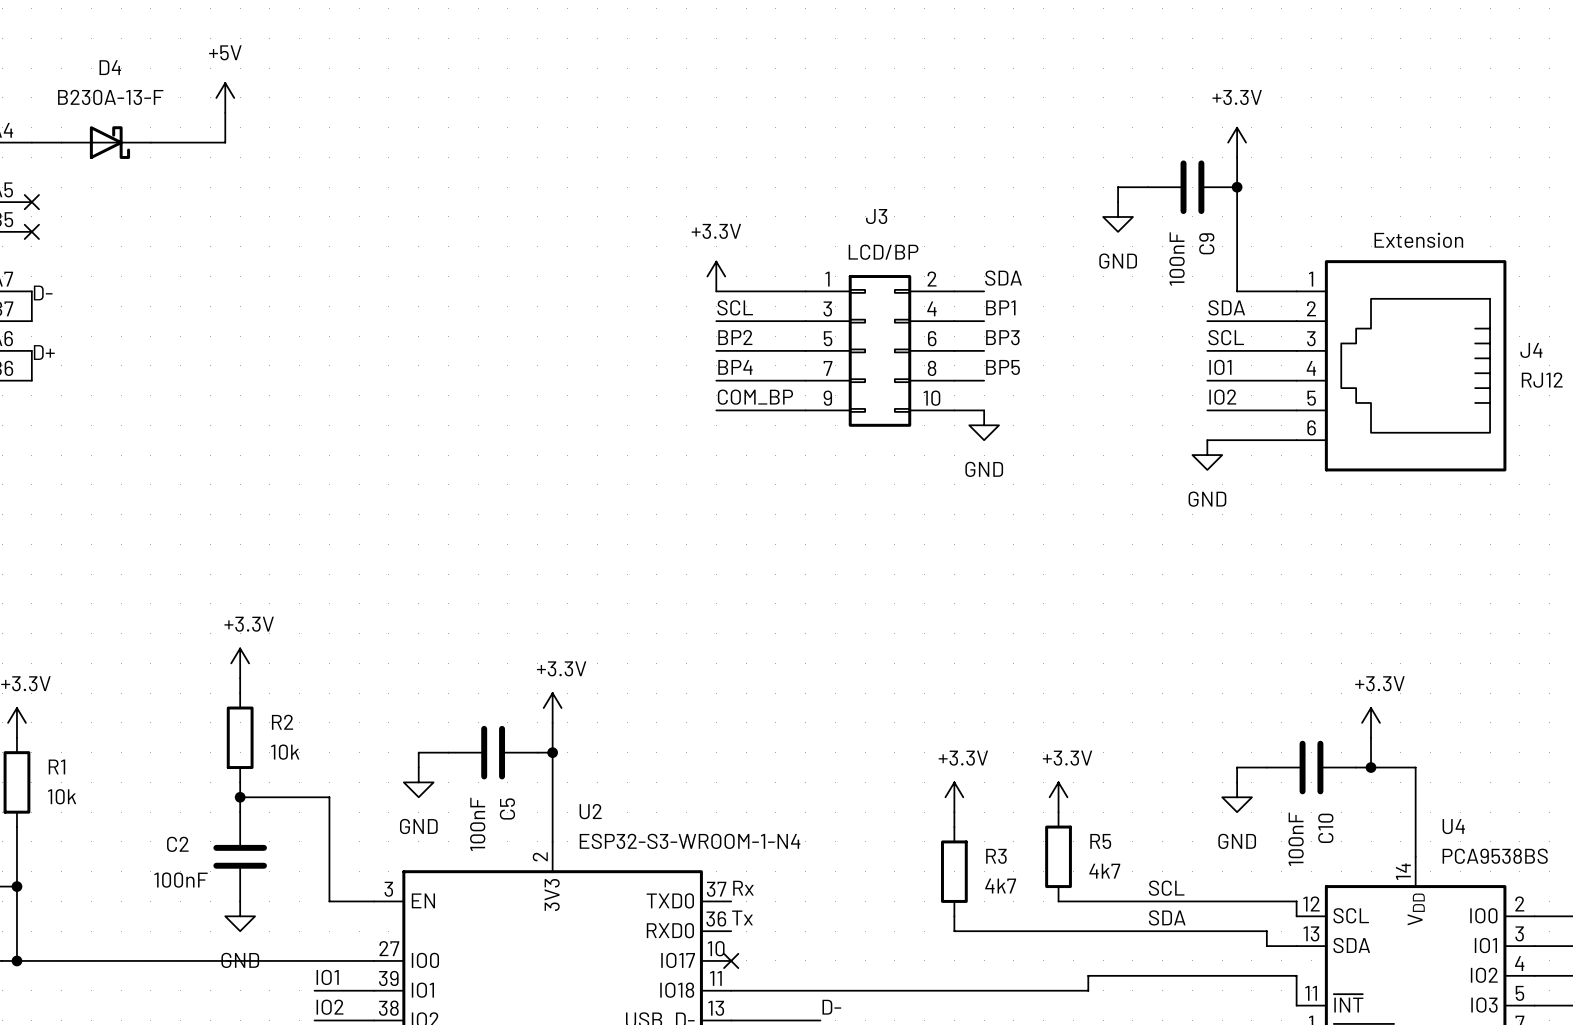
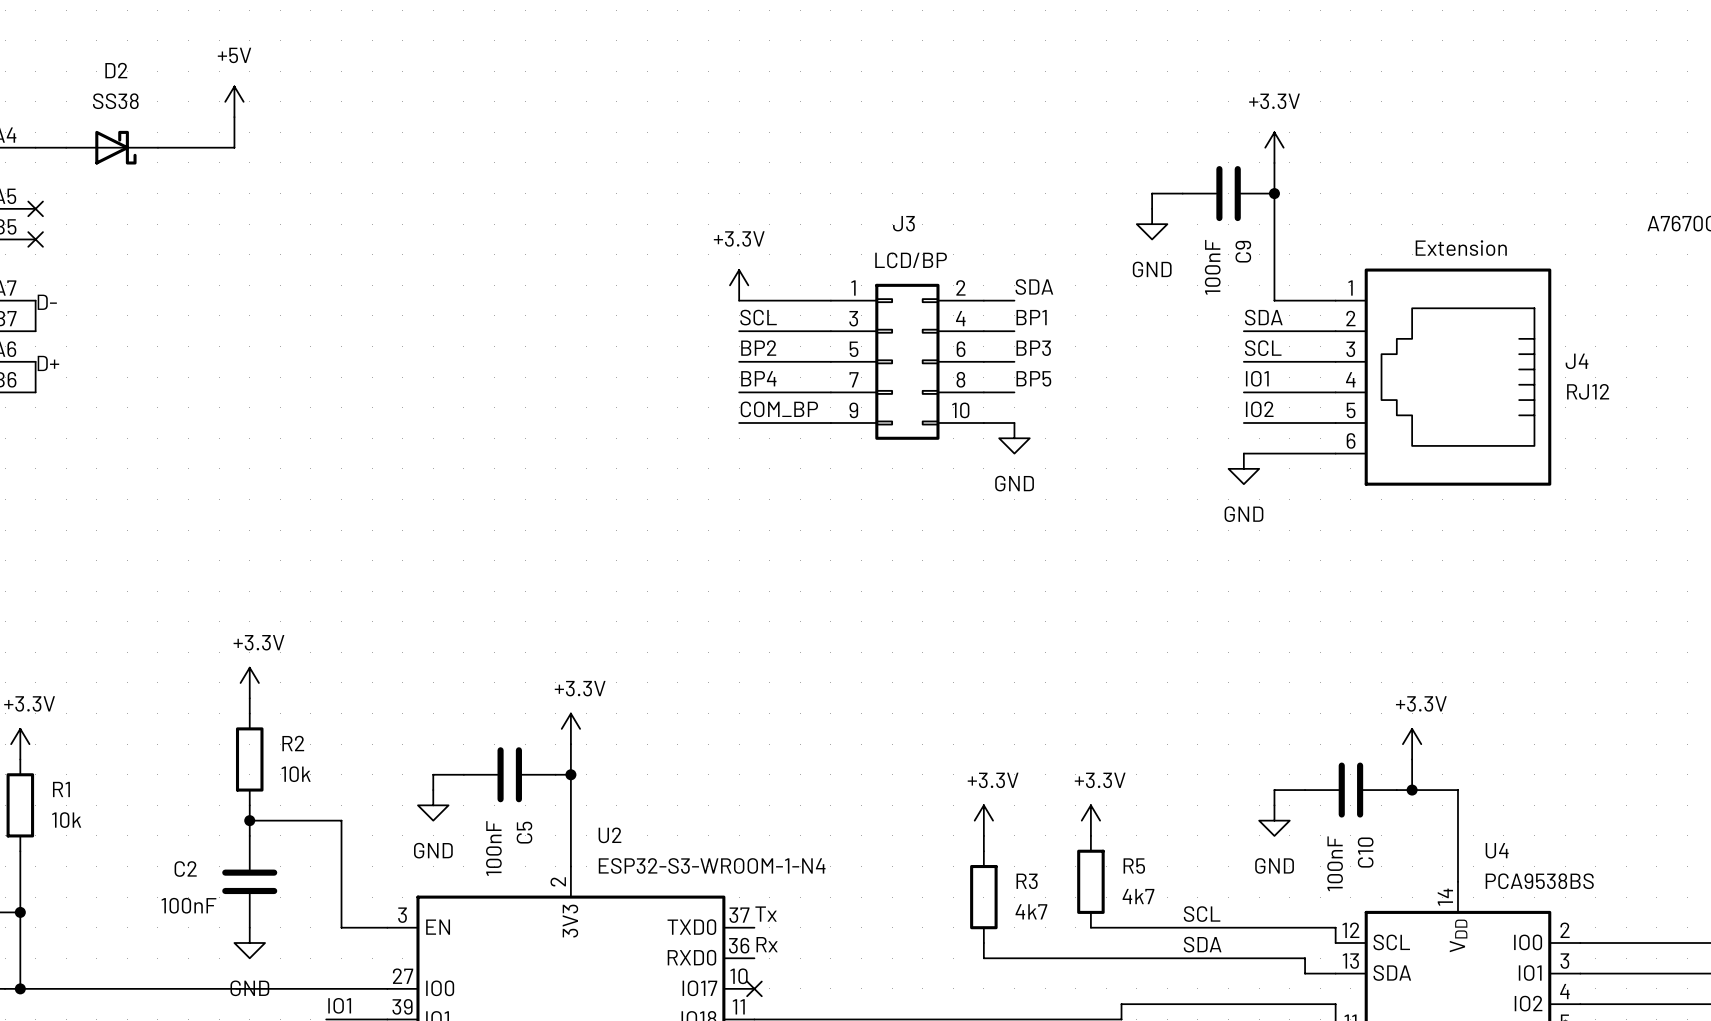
D4 name: D4 (110, 67) -> D2 (116, 70)
D4 value: B230A-13-F (110, 97) -> SS38 (115, 101)
label: Rx (743, 888) -> Tx (766, 914)
label: Tx (742, 917) -> Rx (767, 944)

